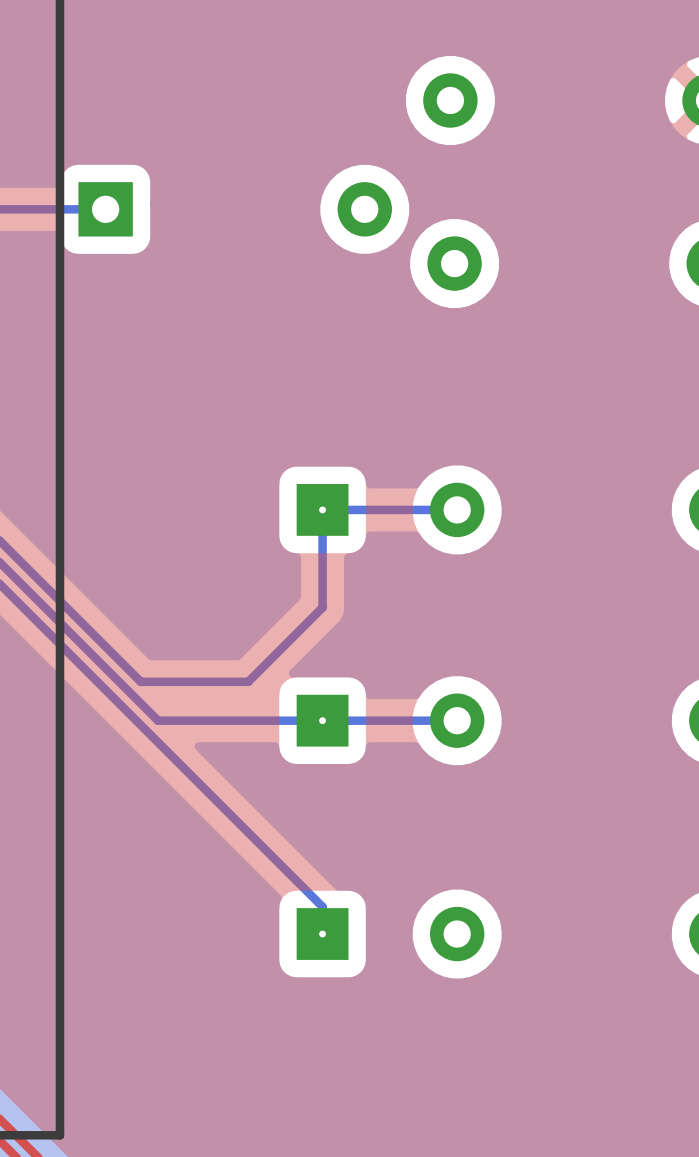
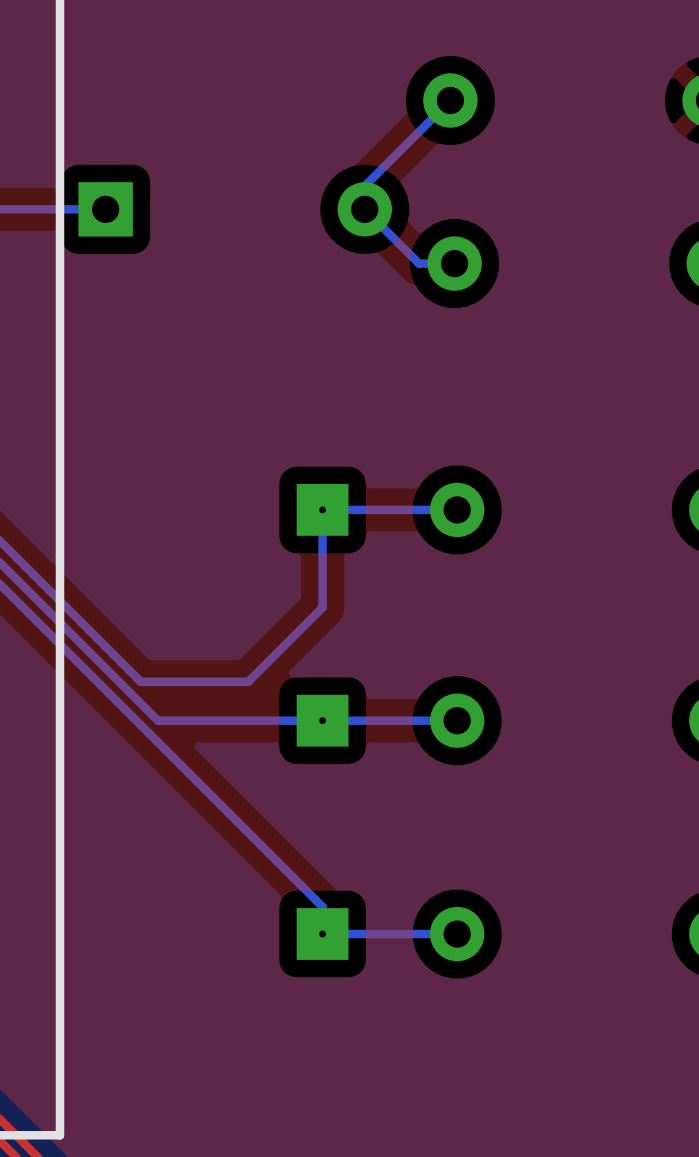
bottom track: none -> (450, 100) (364, 186) (364, 209) (419, 263) (454, 263)
bottom track: none -> (322, 934) (457, 934)

